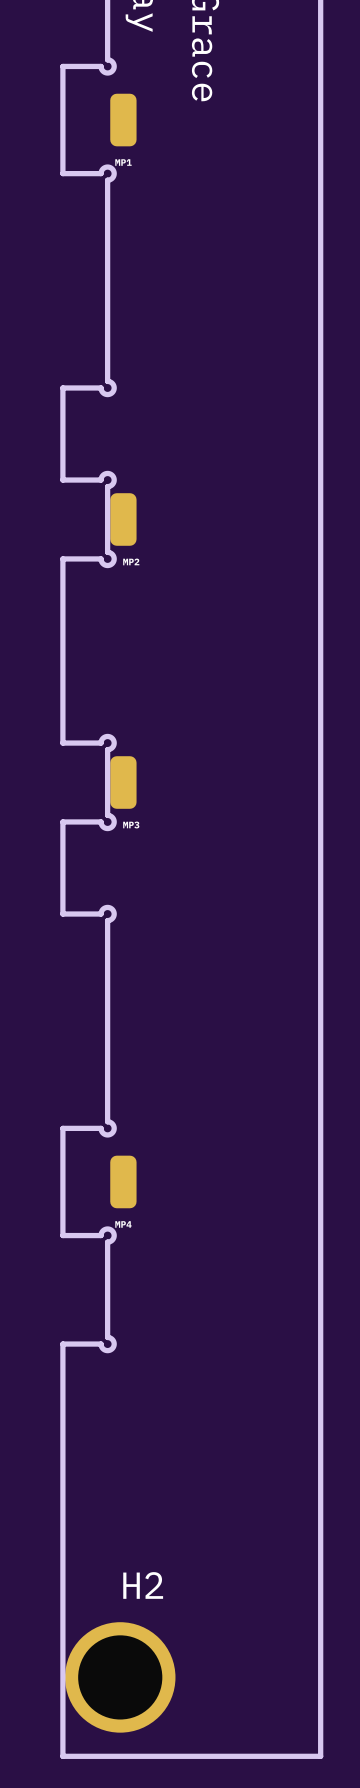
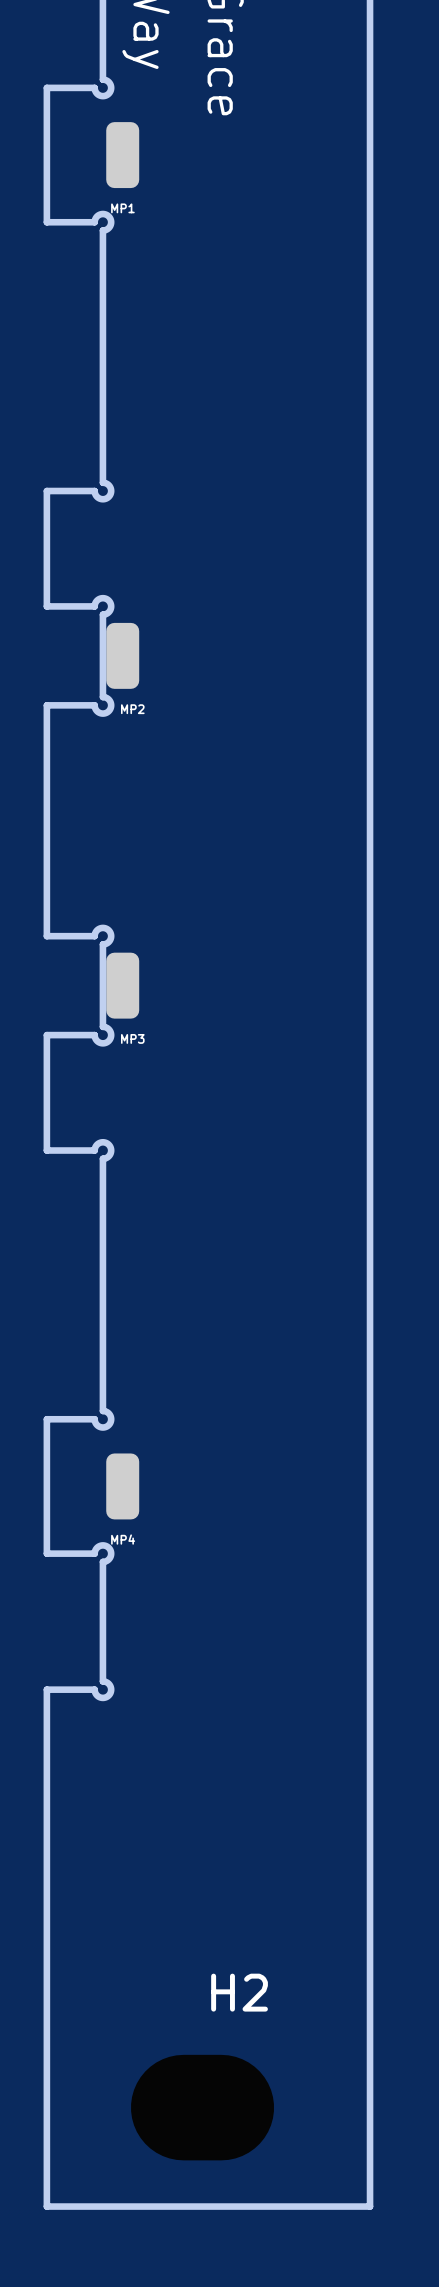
H2 footprint: [65, 1622, 176, 1733] -> [130, 2054, 275, 2161]

